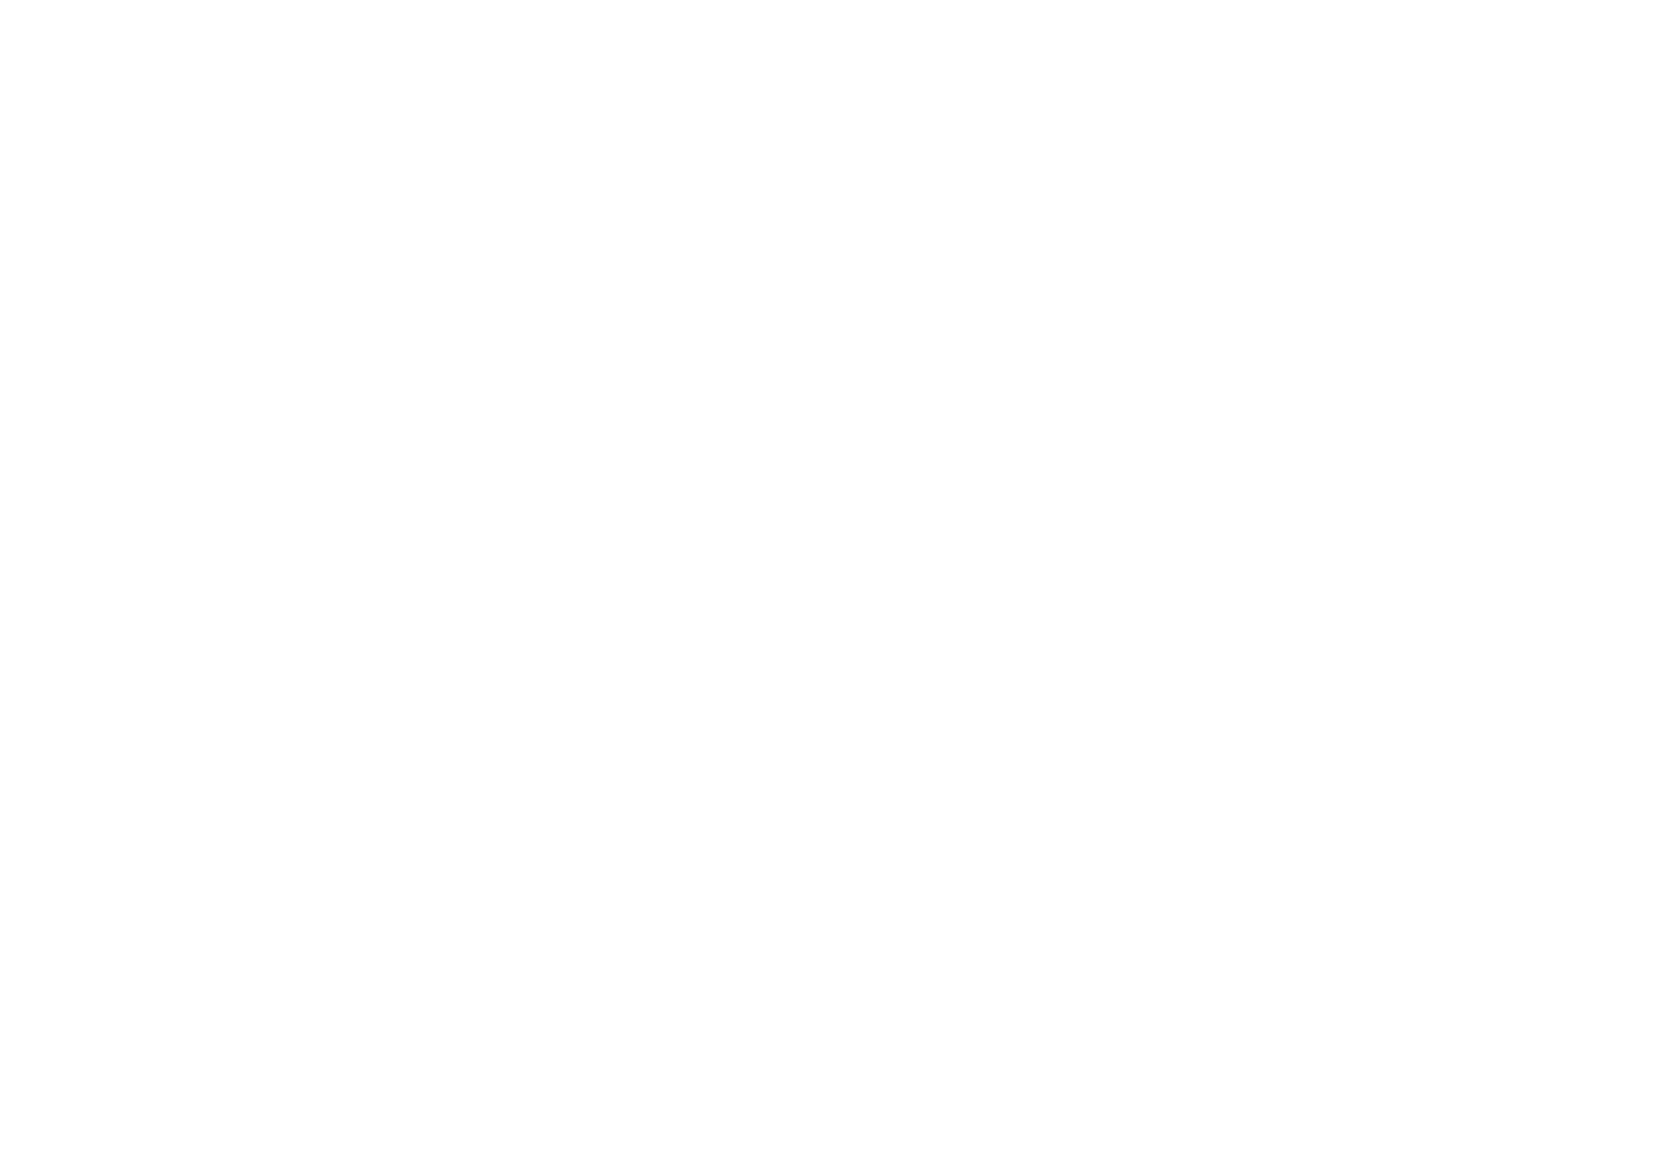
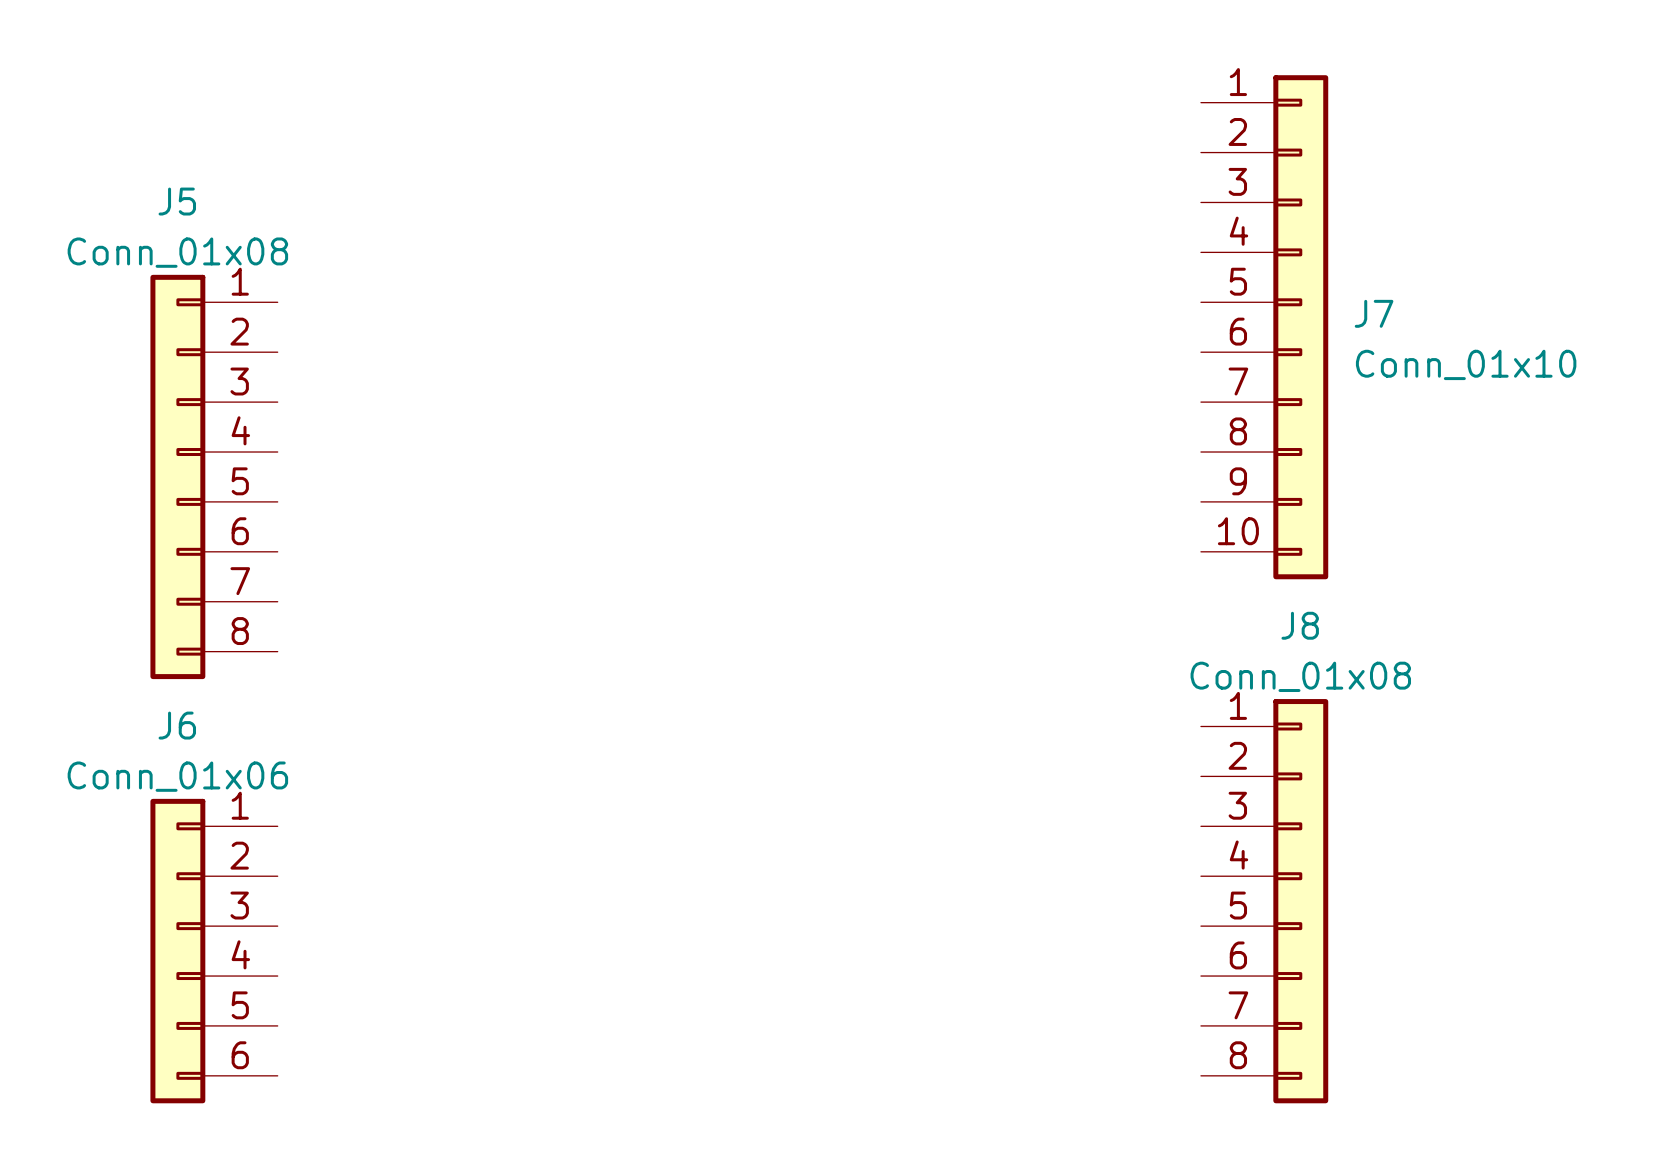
J7: none -> Conn_01x10 (1264, 327)
J5: none -> Conn_01x08 (214, 476)
J8: none -> Conn_01x08 (1264, 901)
J6: none -> Conn_01x06 (214, 951)

